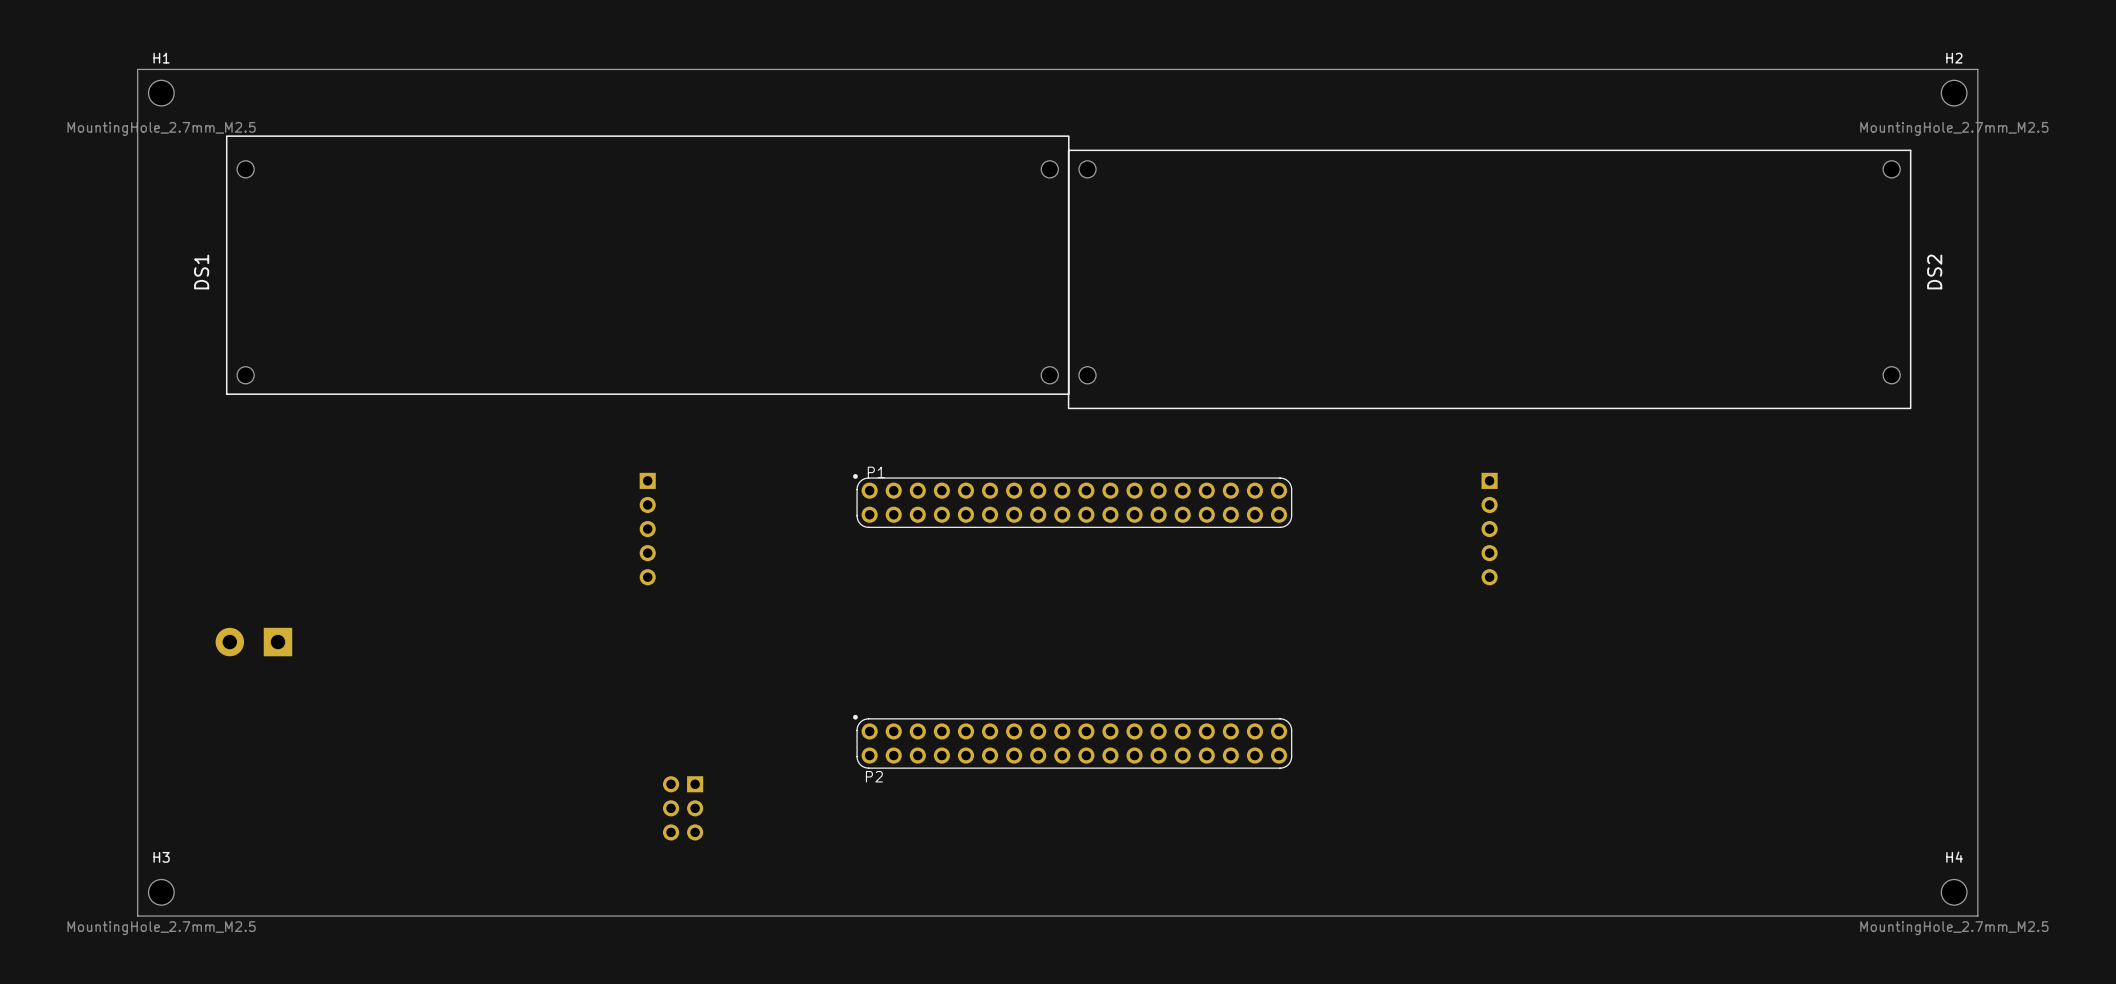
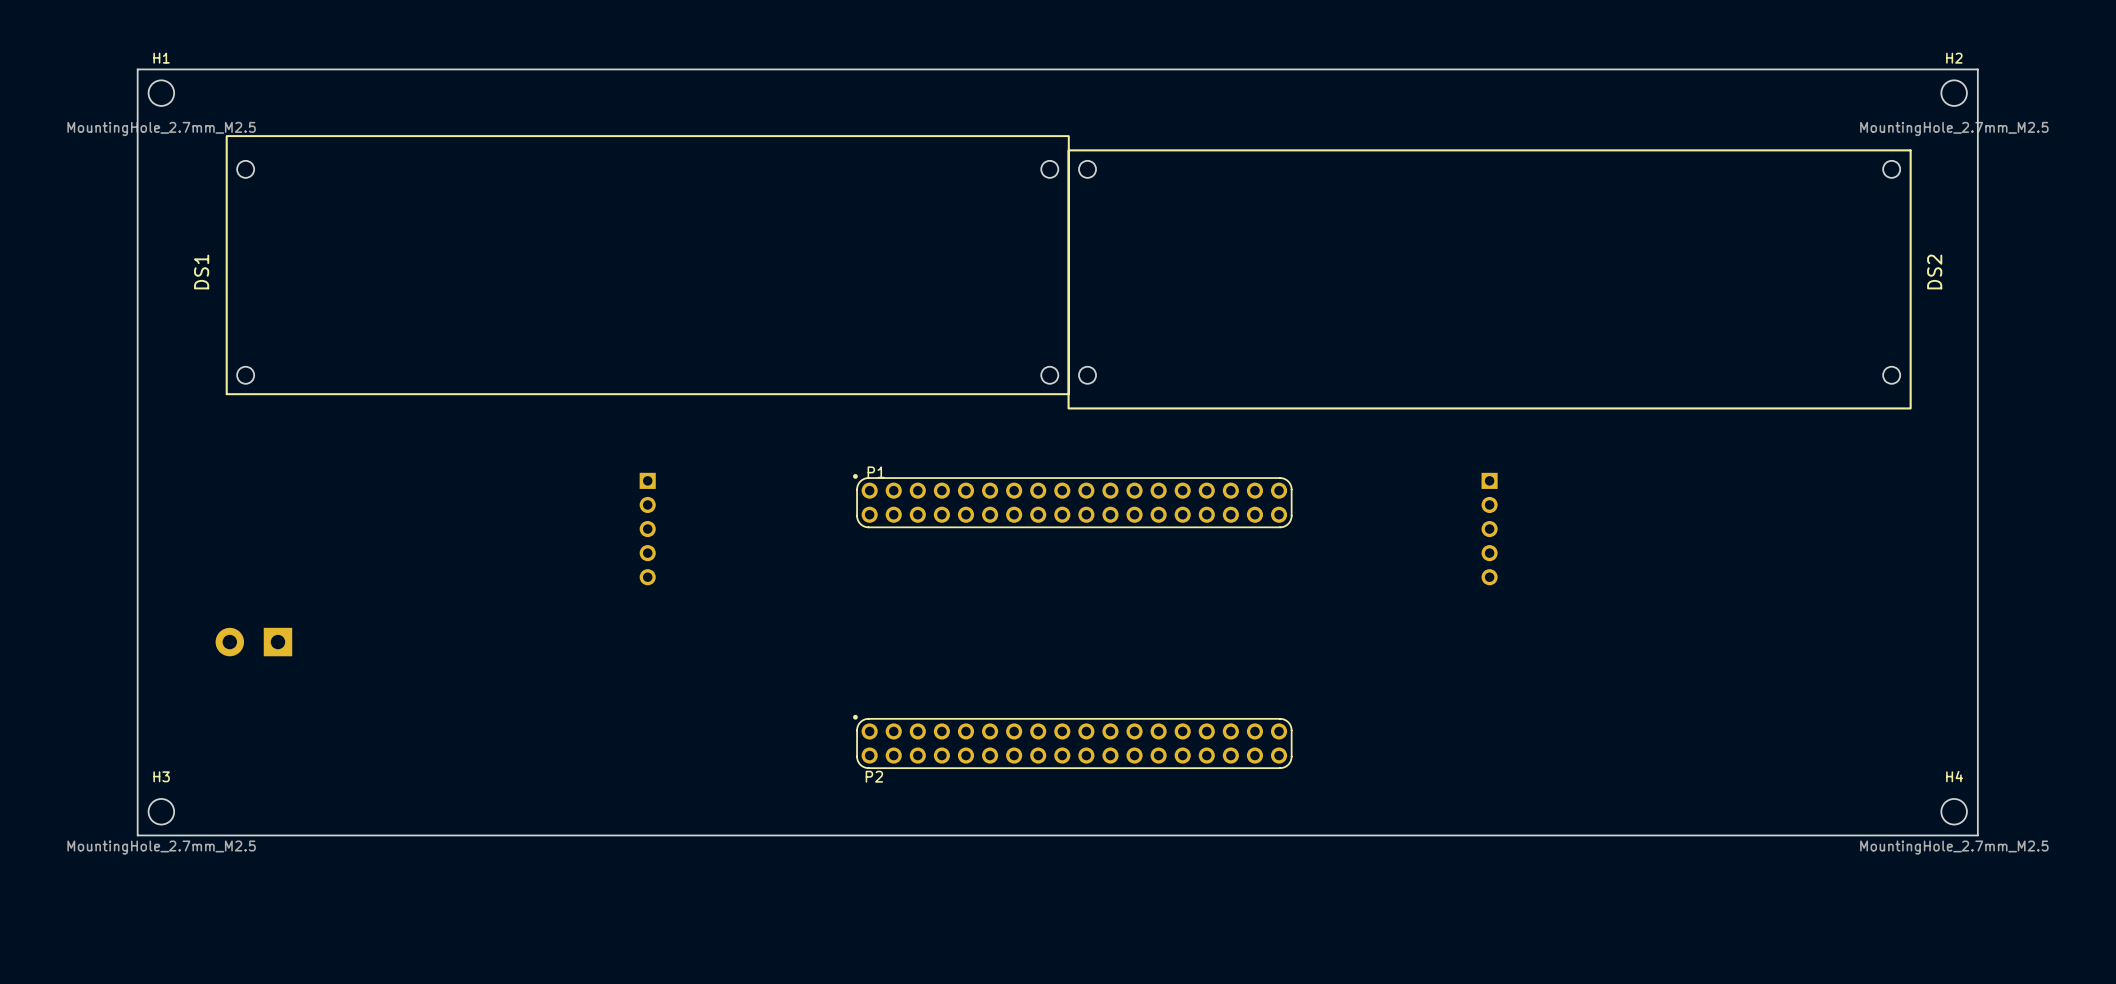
part: (683, 808) -> none
board edge: (137, 835) (137, 916) (1977, 916) (1977, 835) -> (137, 835) (1977, 835)
H3 position: (161, 892) -> (161, 811)
H4 position: (1954, 892) -> (1954, 811)

